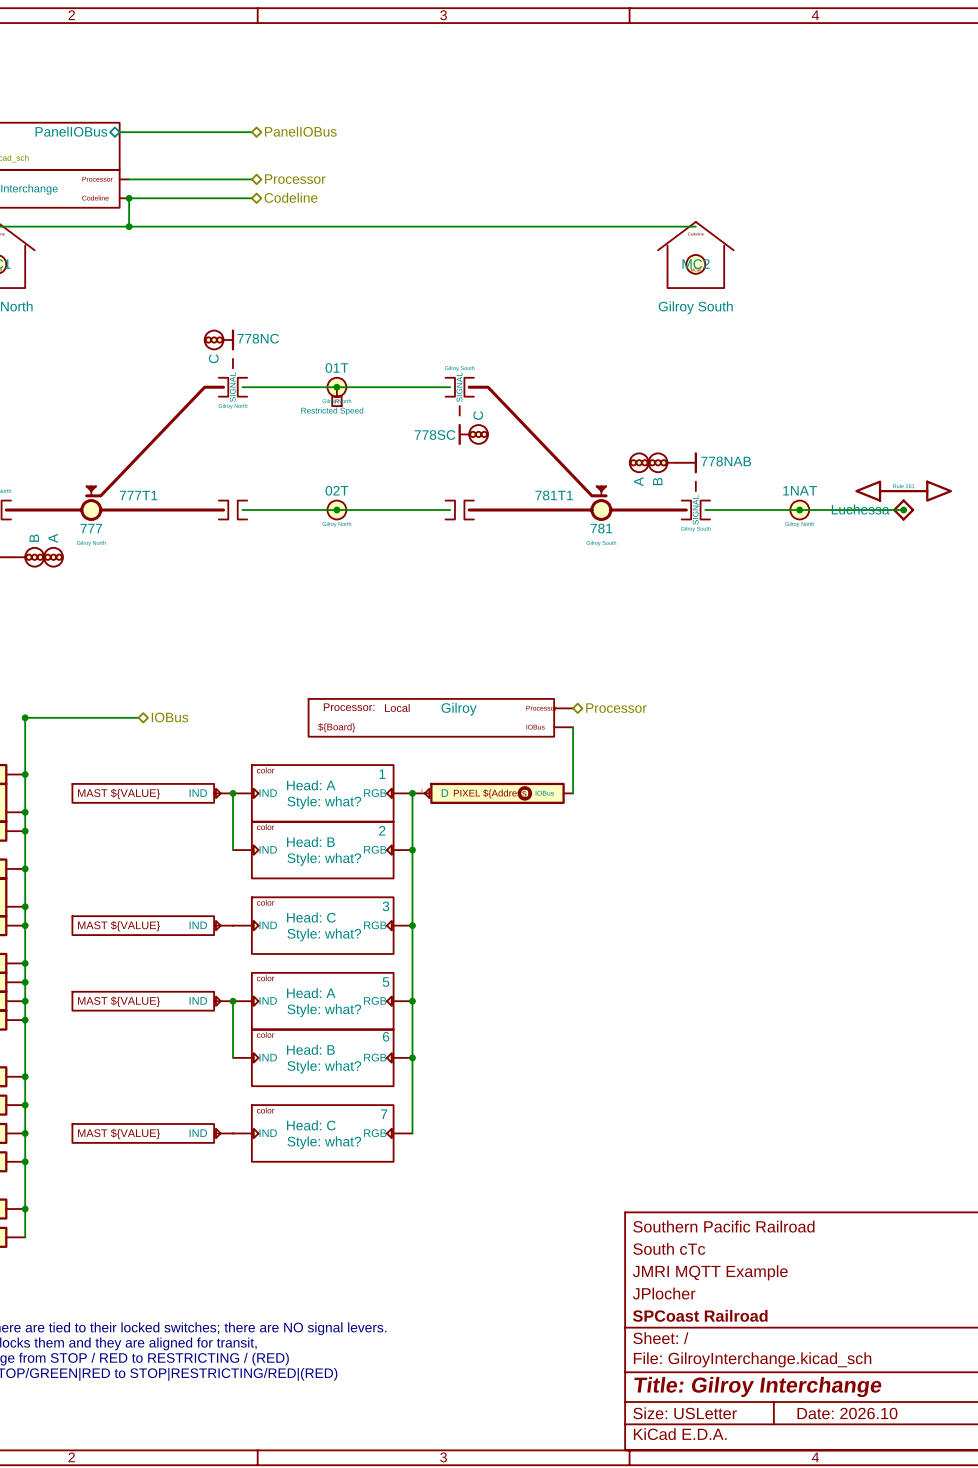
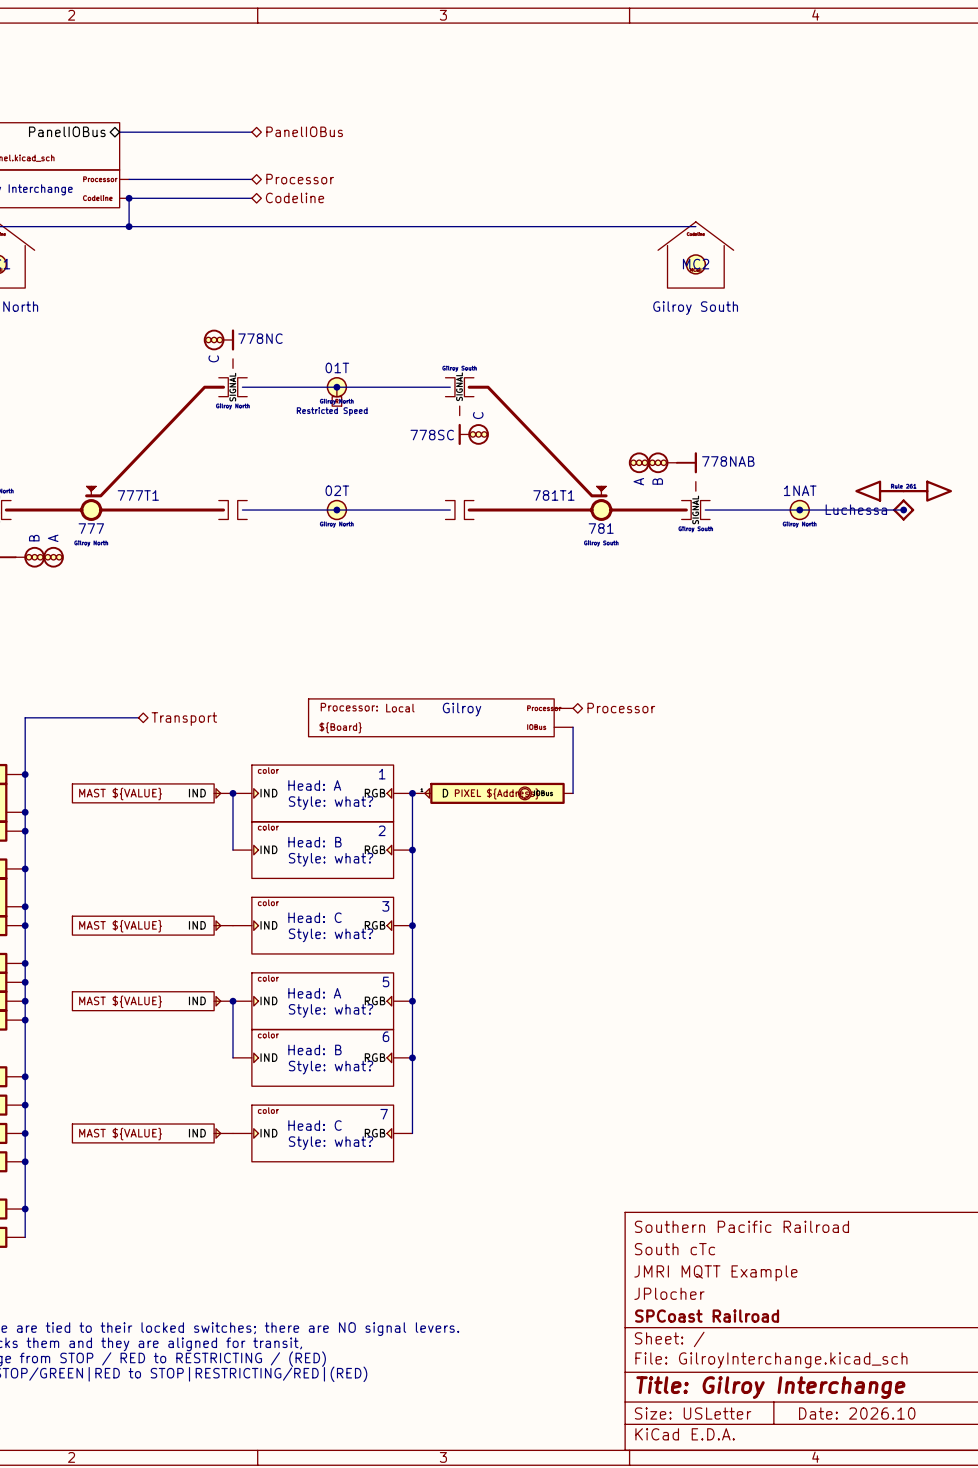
junction: (25, 717) -> none
hierarchical label: IOBus (170, 717) -> Transport (184, 719)

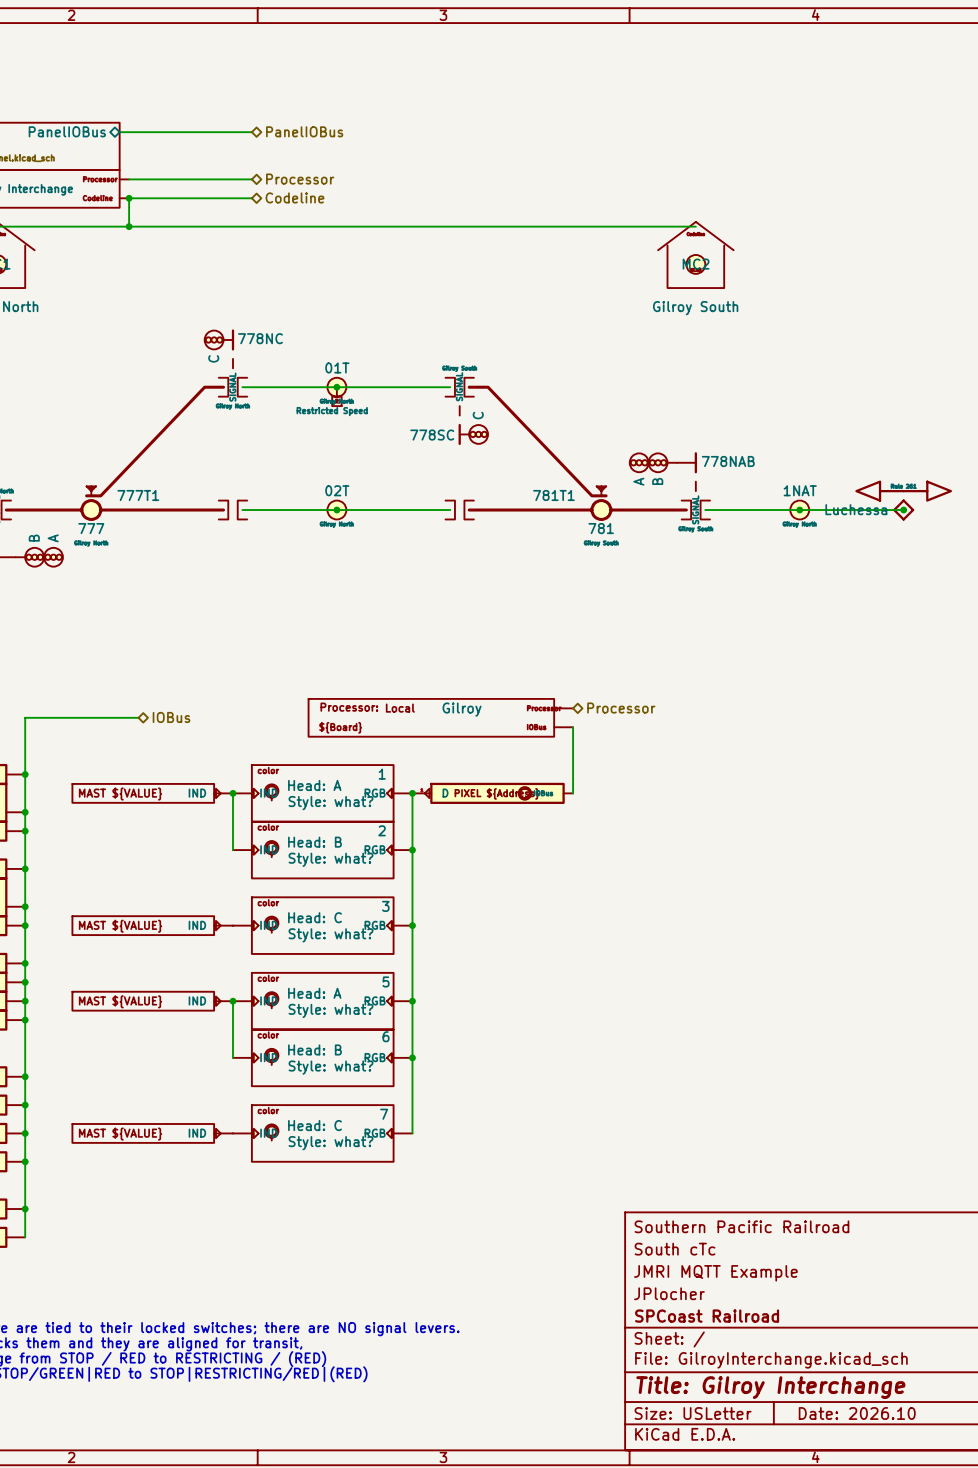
hierarchical label: Transport (184, 719) -> IOBus (171, 717)
part symbol: [233, 765, 413, 822] -> [233, 765, 413, 822]
part symbol: [233, 821, 413, 879] -> [233, 821, 413, 879]
part symbol: [233, 897, 413, 954] -> [233, 897, 413, 954]
part symbol: [233, 972, 413, 1030] -> [233, 972, 413, 1030]
part symbol: [233, 1029, 413, 1087] -> [233, 1029, 413, 1087]
part symbol: [233, 1105, 413, 1162] -> [233, 1105, 413, 1162]

